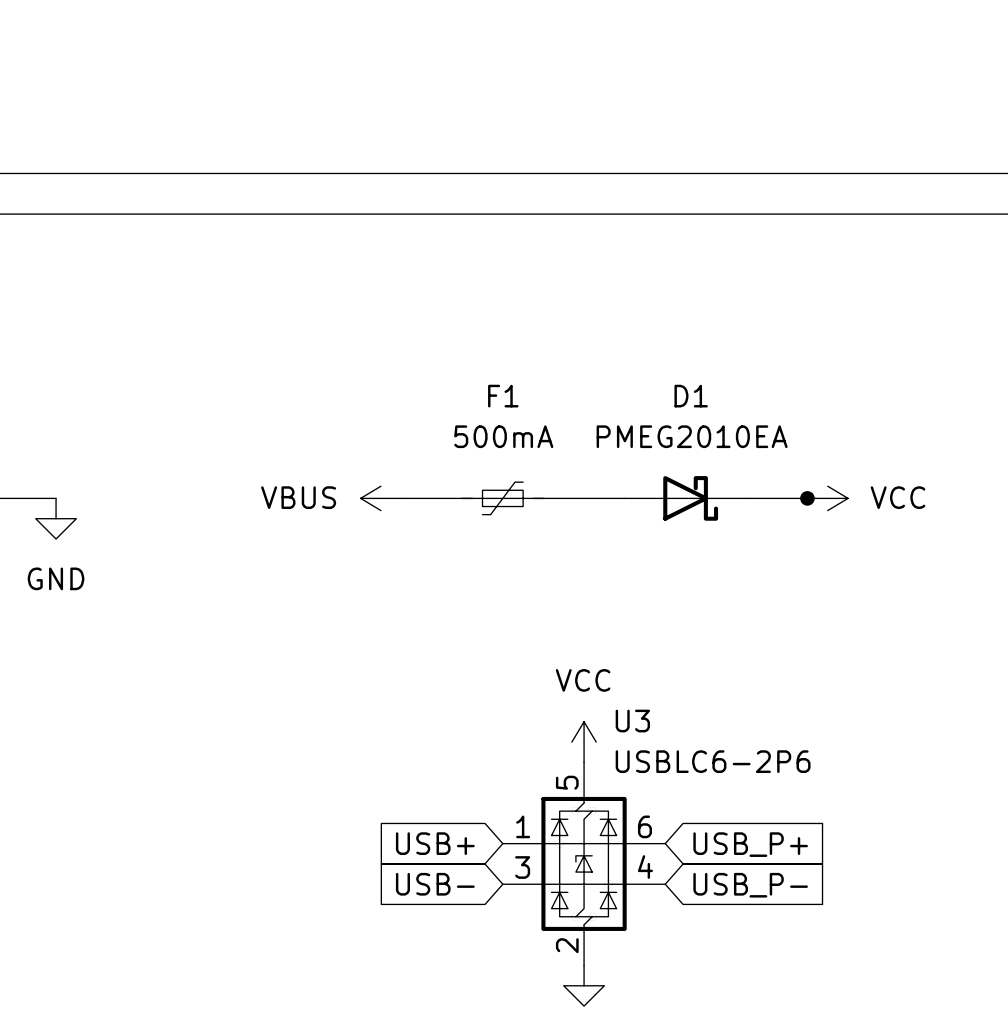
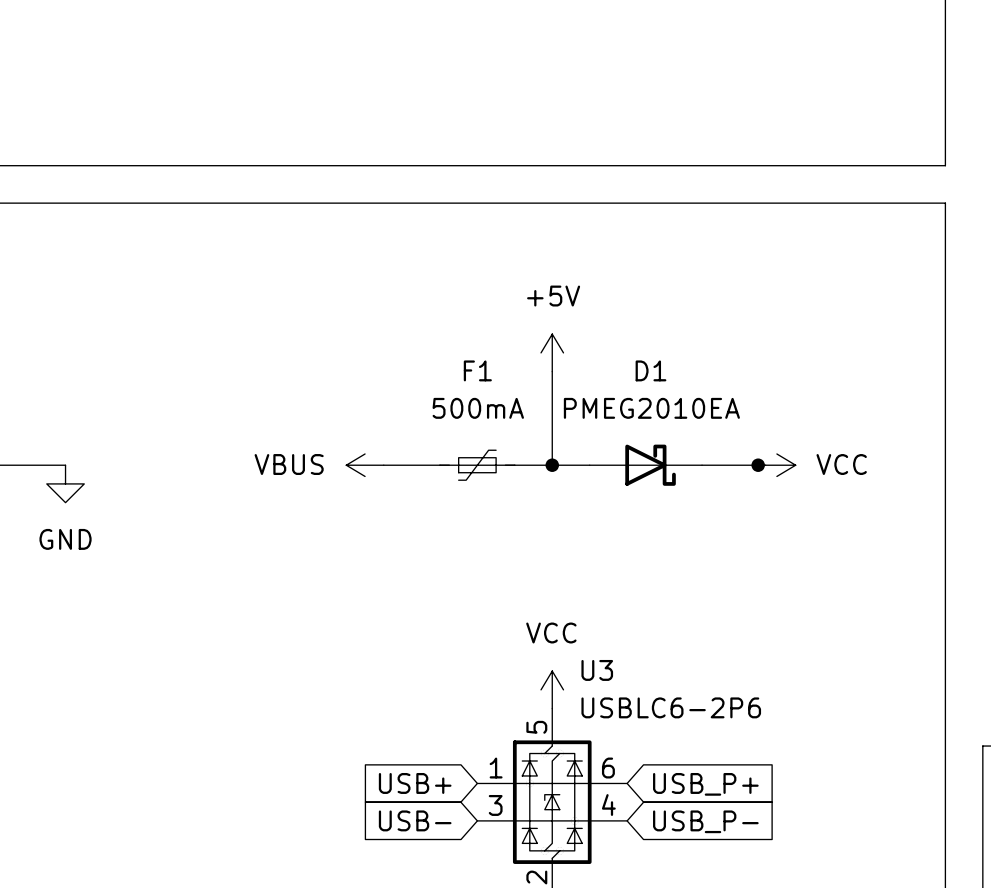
power symbol: none -> +5V (552, 352)
wire: none -> (552, 371) (552, 465)
junction: none -> (552, 465)

